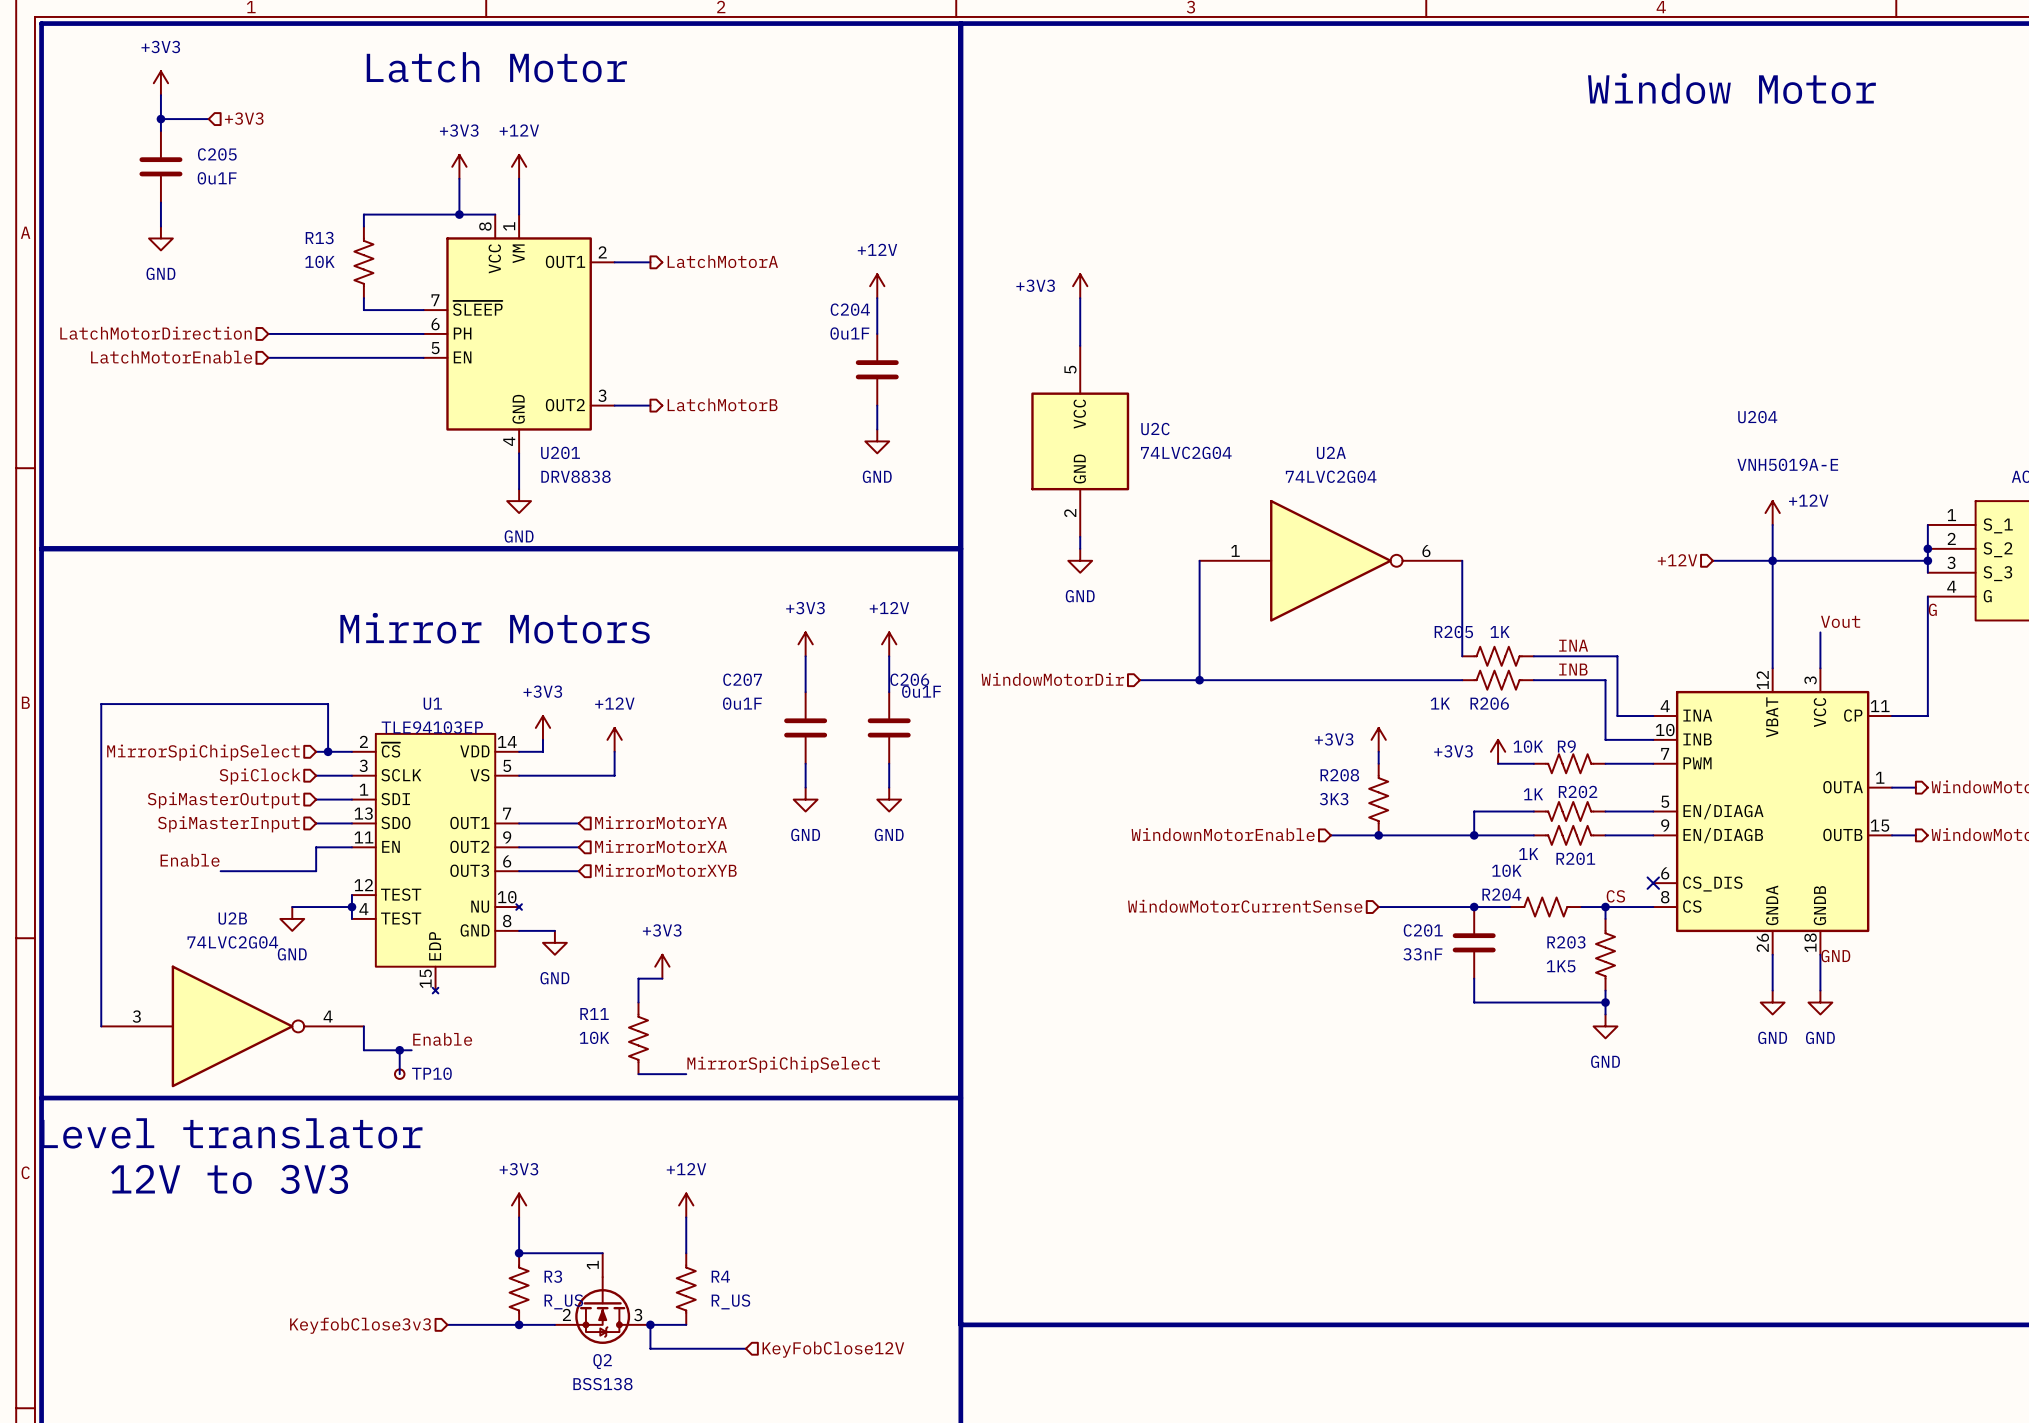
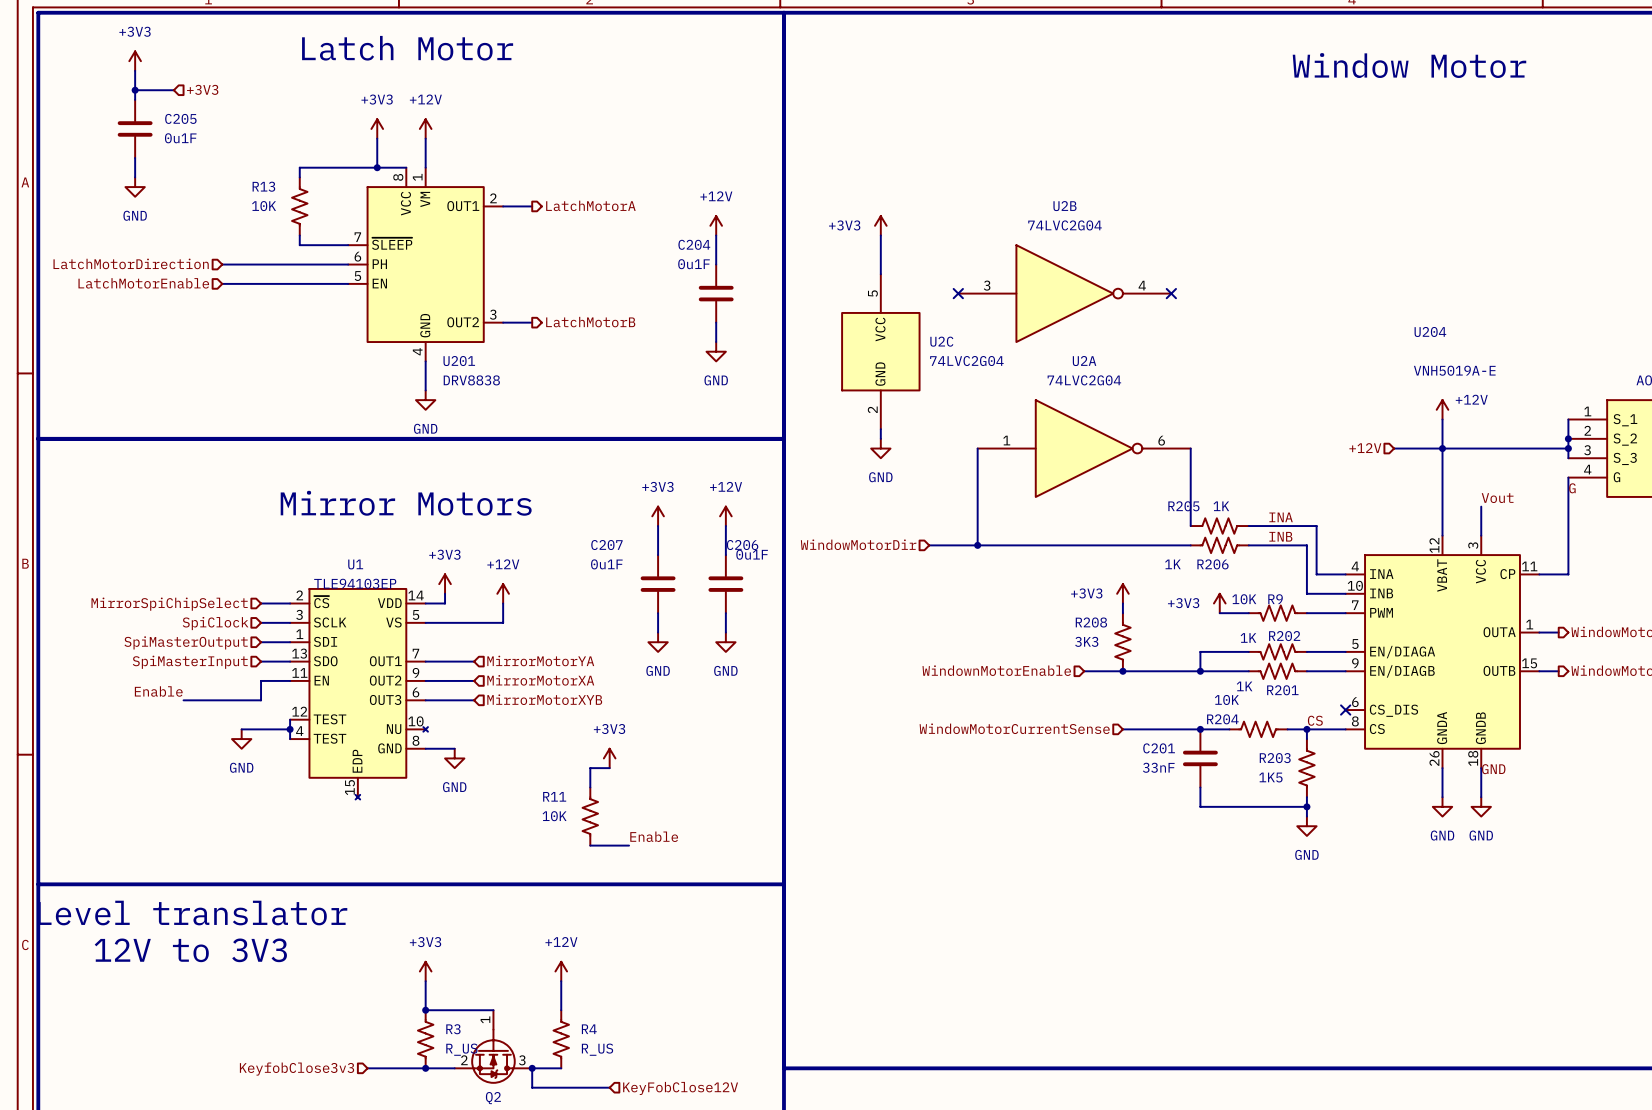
no-connect mark: none -> (958, 293)
no-connect mark: none -> (1171, 293)
wire: (328, 751) (328, 704) (101, 704) (101, 1026) -> none
junction: (328, 751) -> none
power symbol position: +3V3 (662, 966) -> +3V3 (609, 758)
wire: (662, 978) (638, 978) (638, 1002) -> (609, 768) (590, 768) (590, 787)
U2B position: (232, 1026) -> (1064, 293)
wire: (363, 1026) (363, 1050) (411, 1050) -> none
R11 position: (638, 1038) -> (590, 816)
label: Enable (442, 1039) -> none
label: none -> Enable (654, 836)
wire: (399, 1050) (399, 1074) -> none
junction: (399, 1050) -> none
label: MirrorSpiChipSelect (783, 1064) -> none
TP10: (399, 1074) -> none
wire: (638, 1074) (686, 1074) -> (590, 845) (629, 845)

